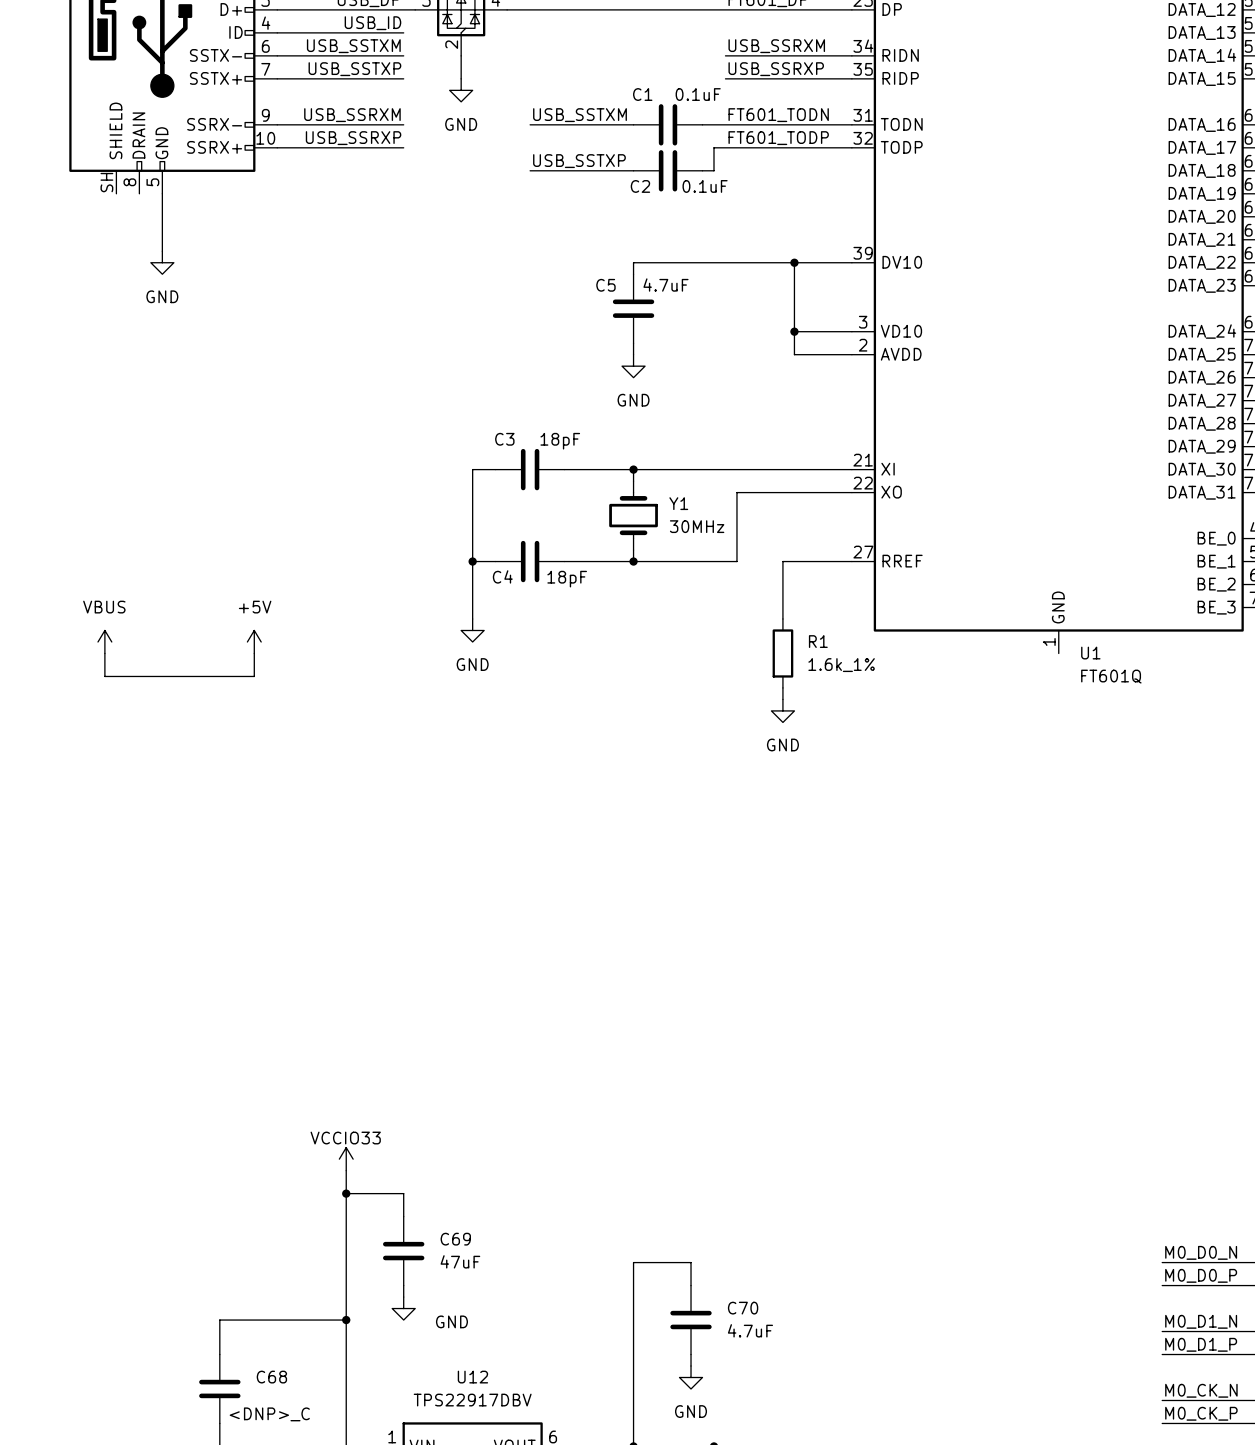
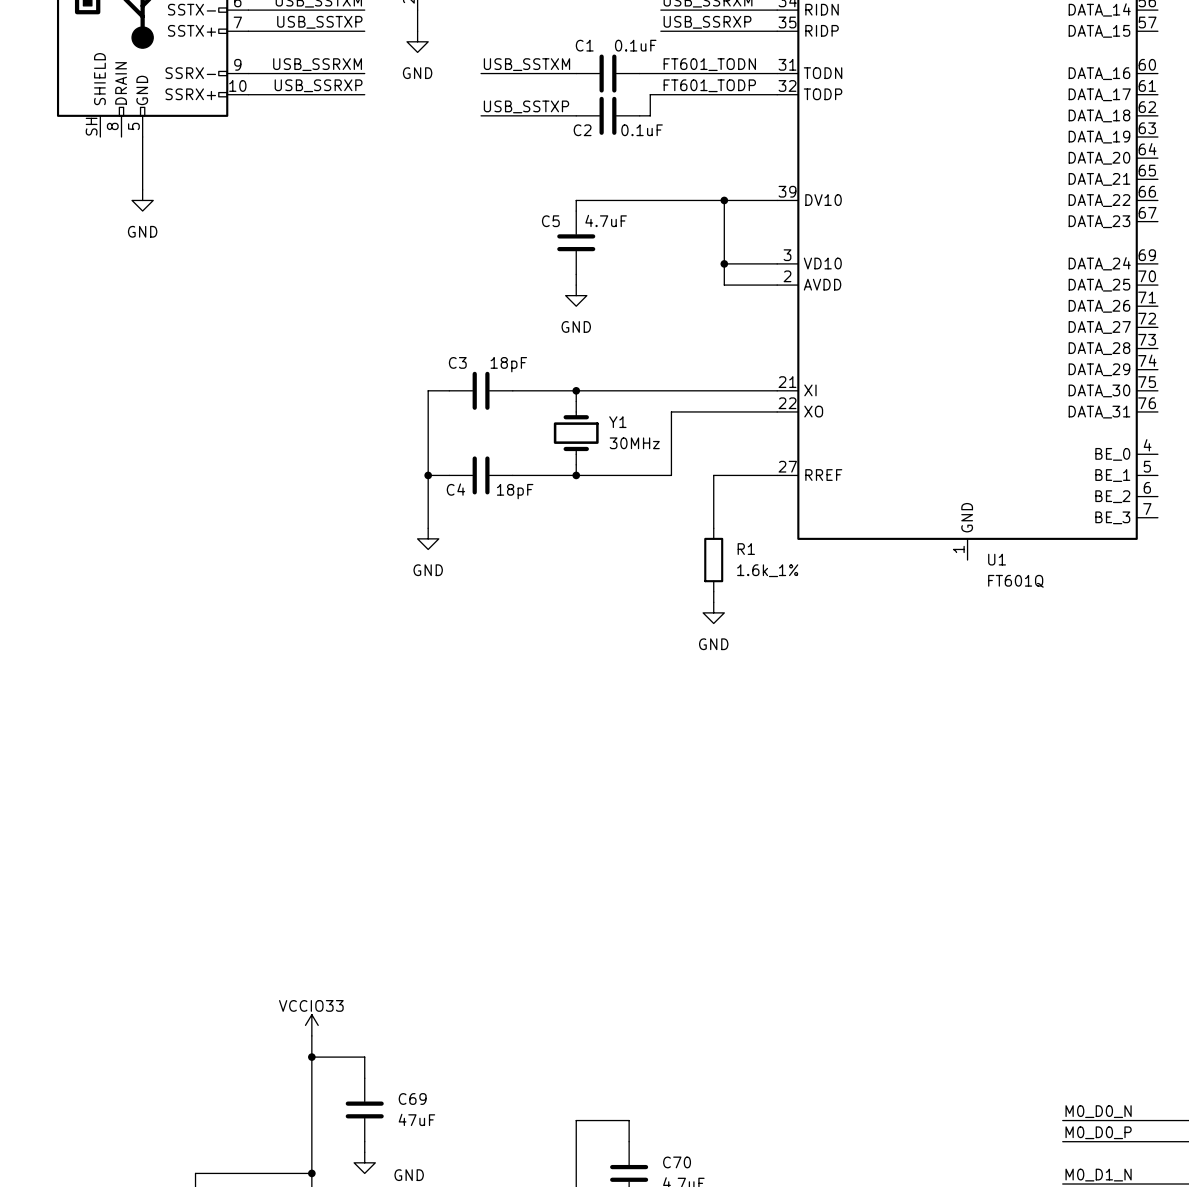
power symbol: VBUS (104, 641) -> none
power symbol: +5V (254, 641) -> none
wire: (104, 653) (104, 676) (254, 676) (254, 653) -> none

